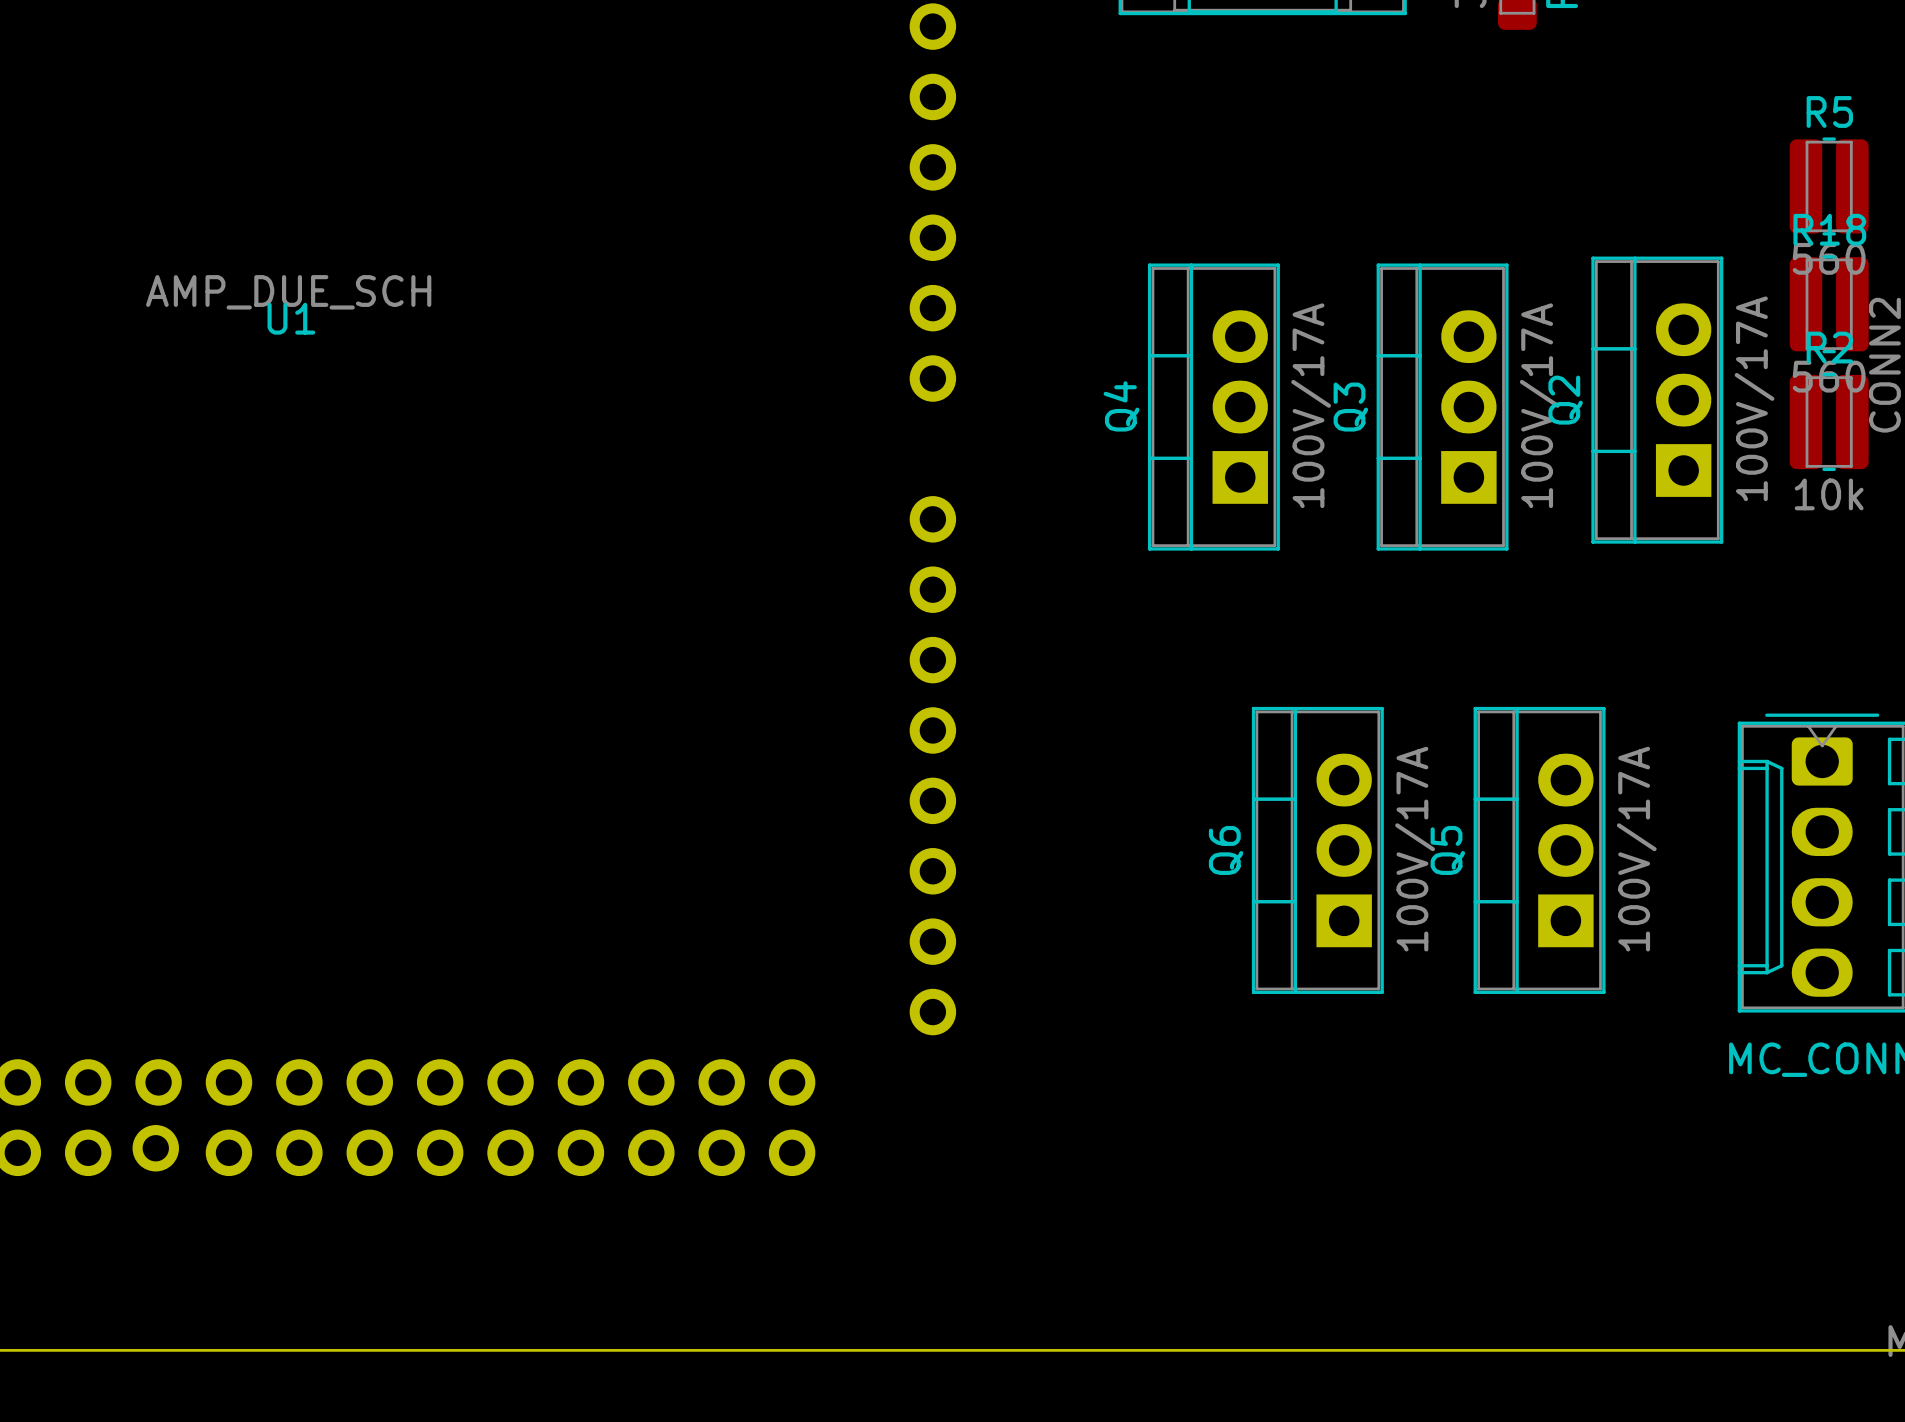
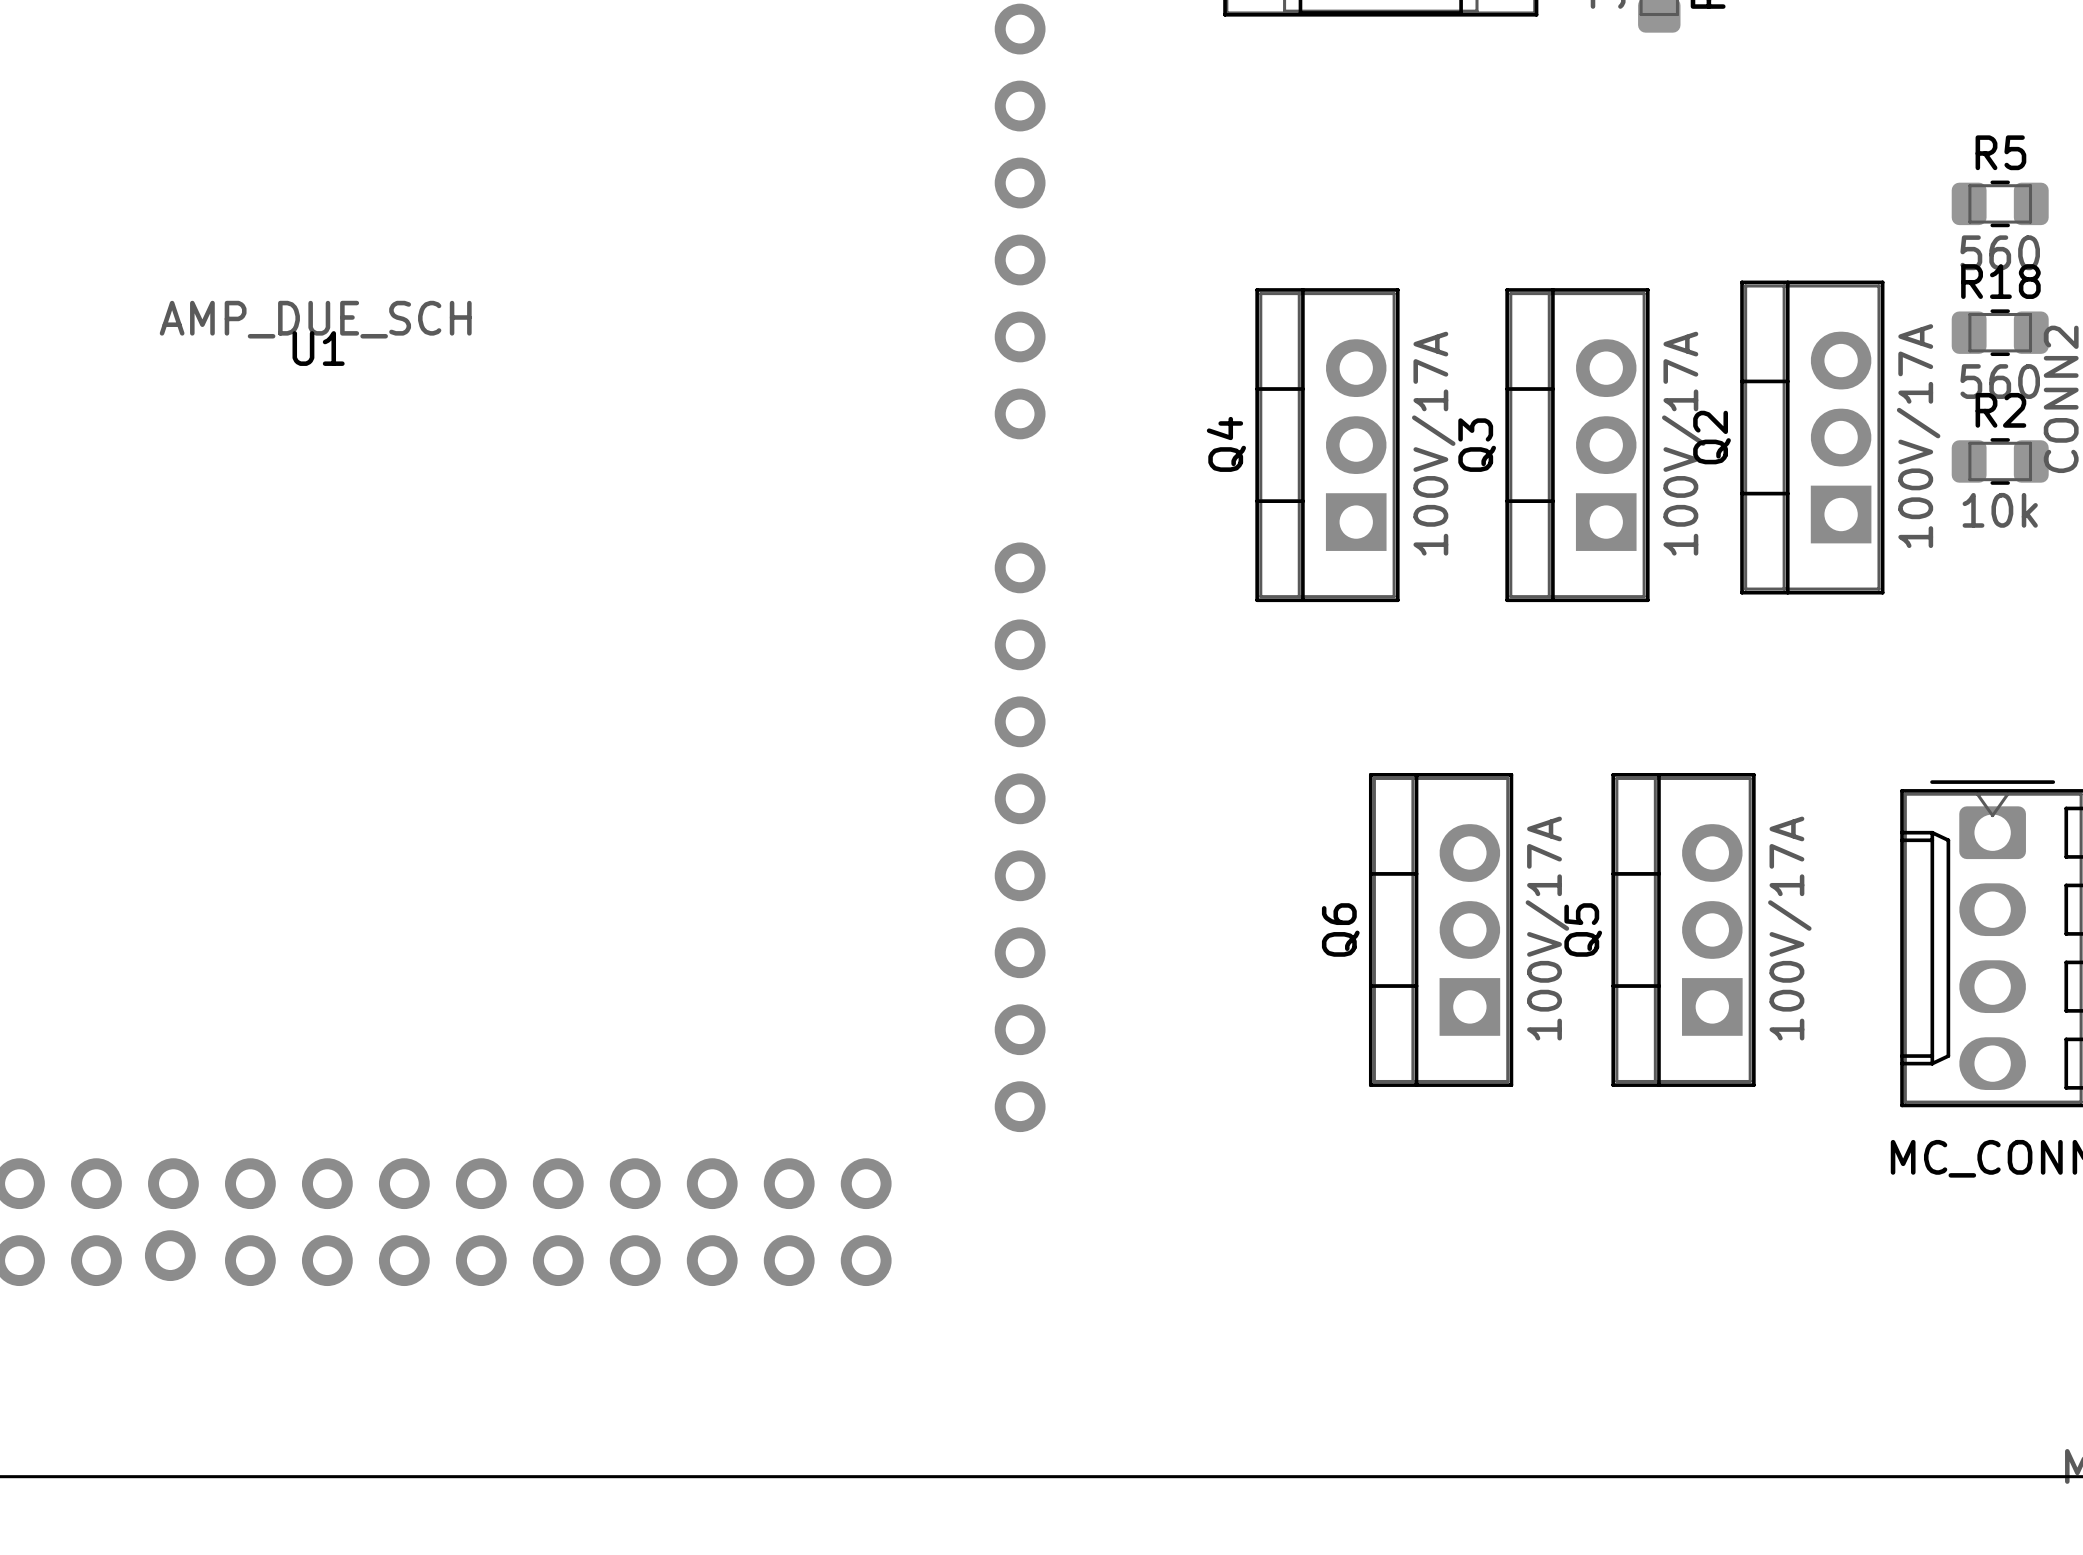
R5 footprint: [1789, 137, 1869, 236] -> [1951, 180, 2049, 228]
R18 footprint: [1789, 255, 1869, 354] -> [1951, 309, 2049, 357]
R2 footprint: [1789, 372, 1869, 472] -> [1951, 438, 2049, 485]

